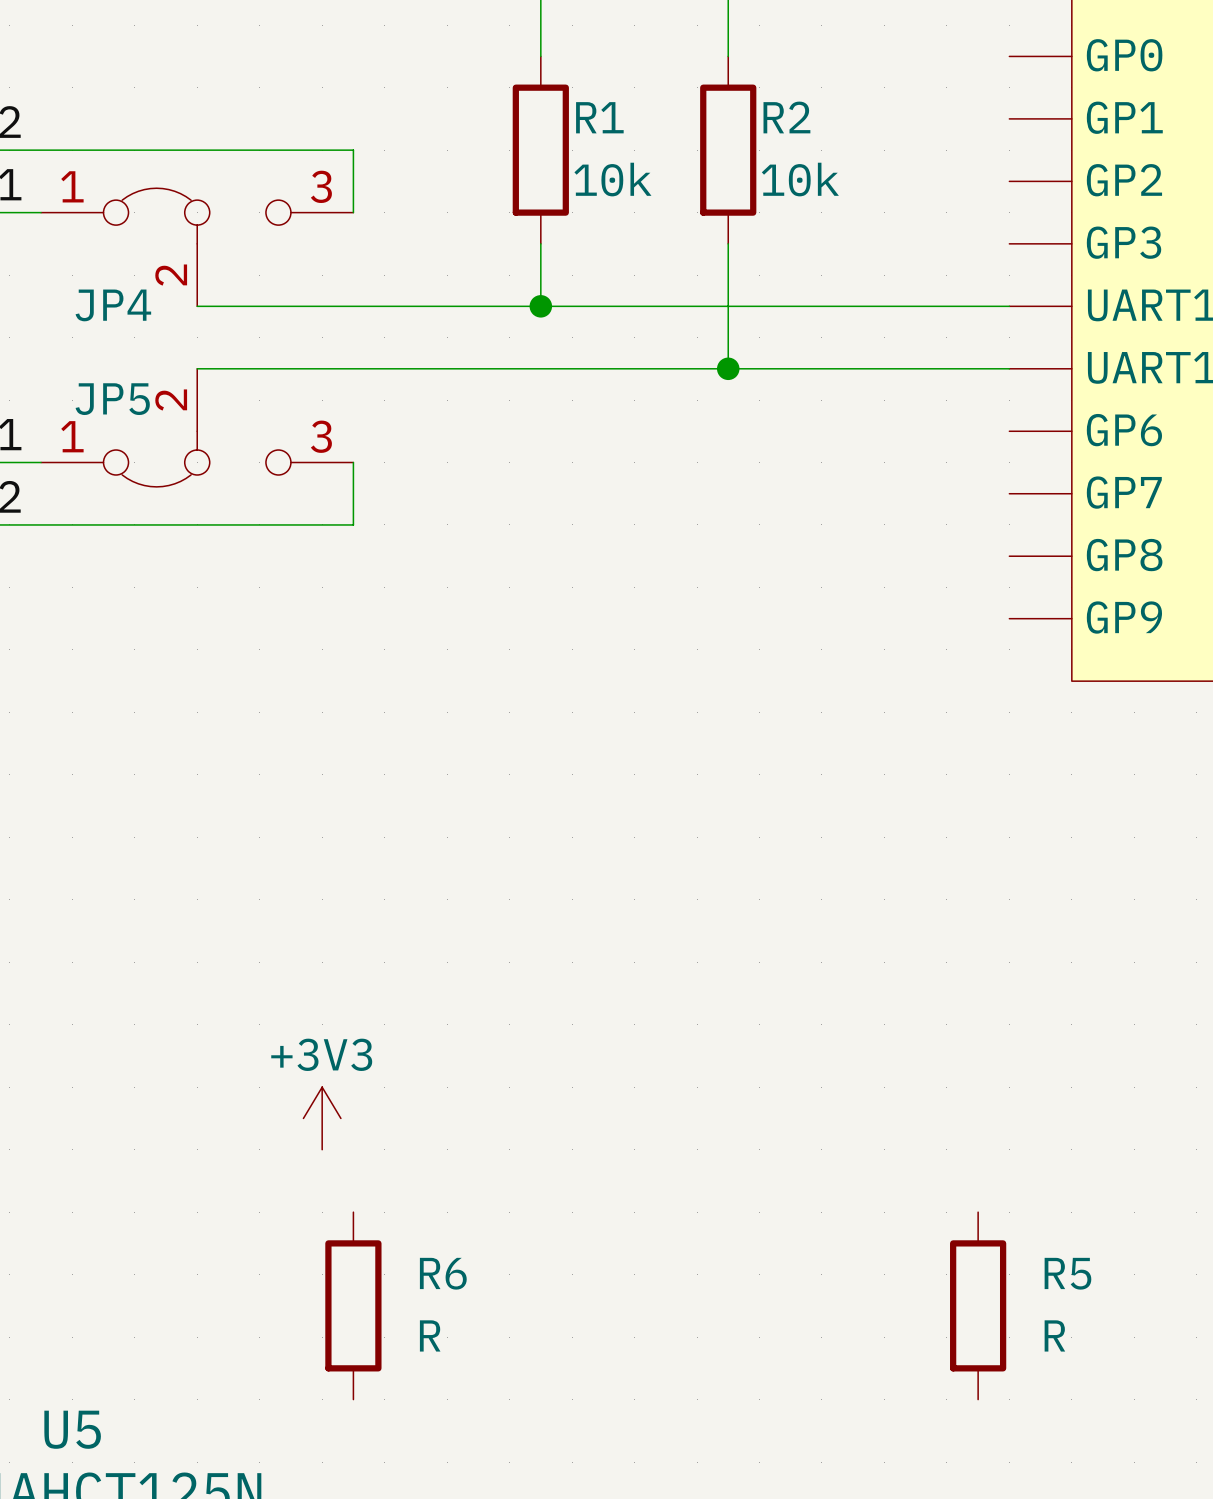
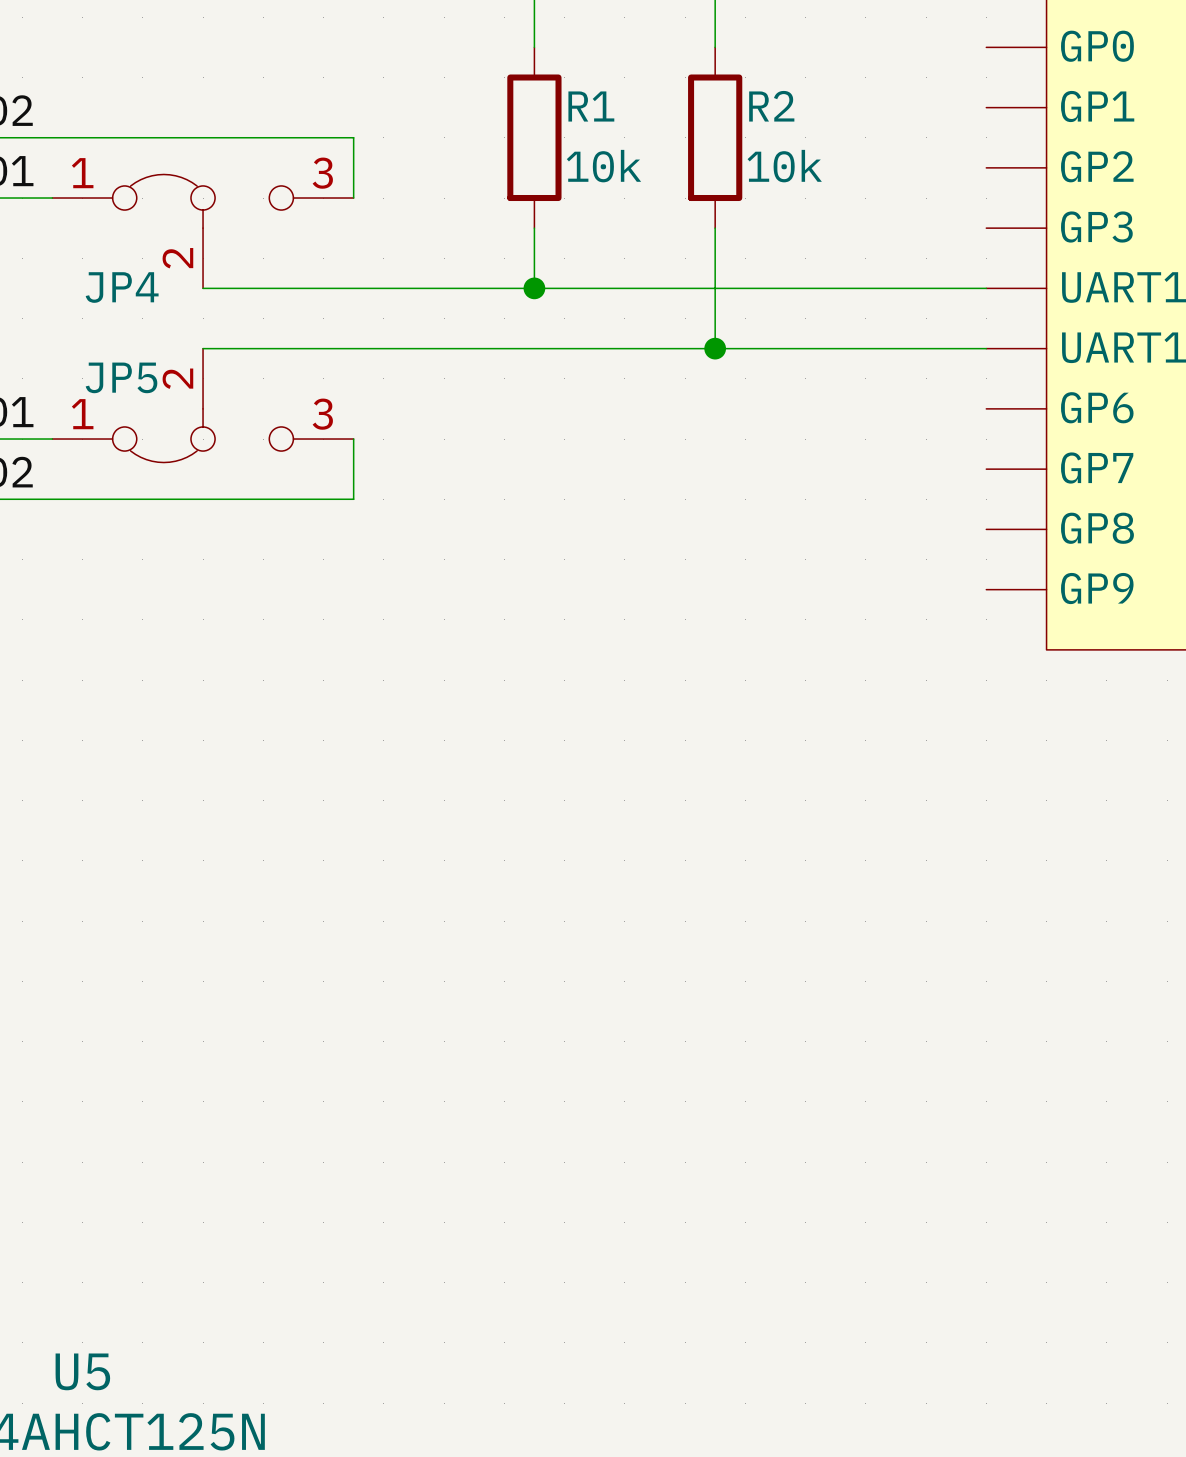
power symbol: +3V3 (322, 1118) -> none
R6: R (353, 1305) -> none
R5: R (978, 1305) -> none

